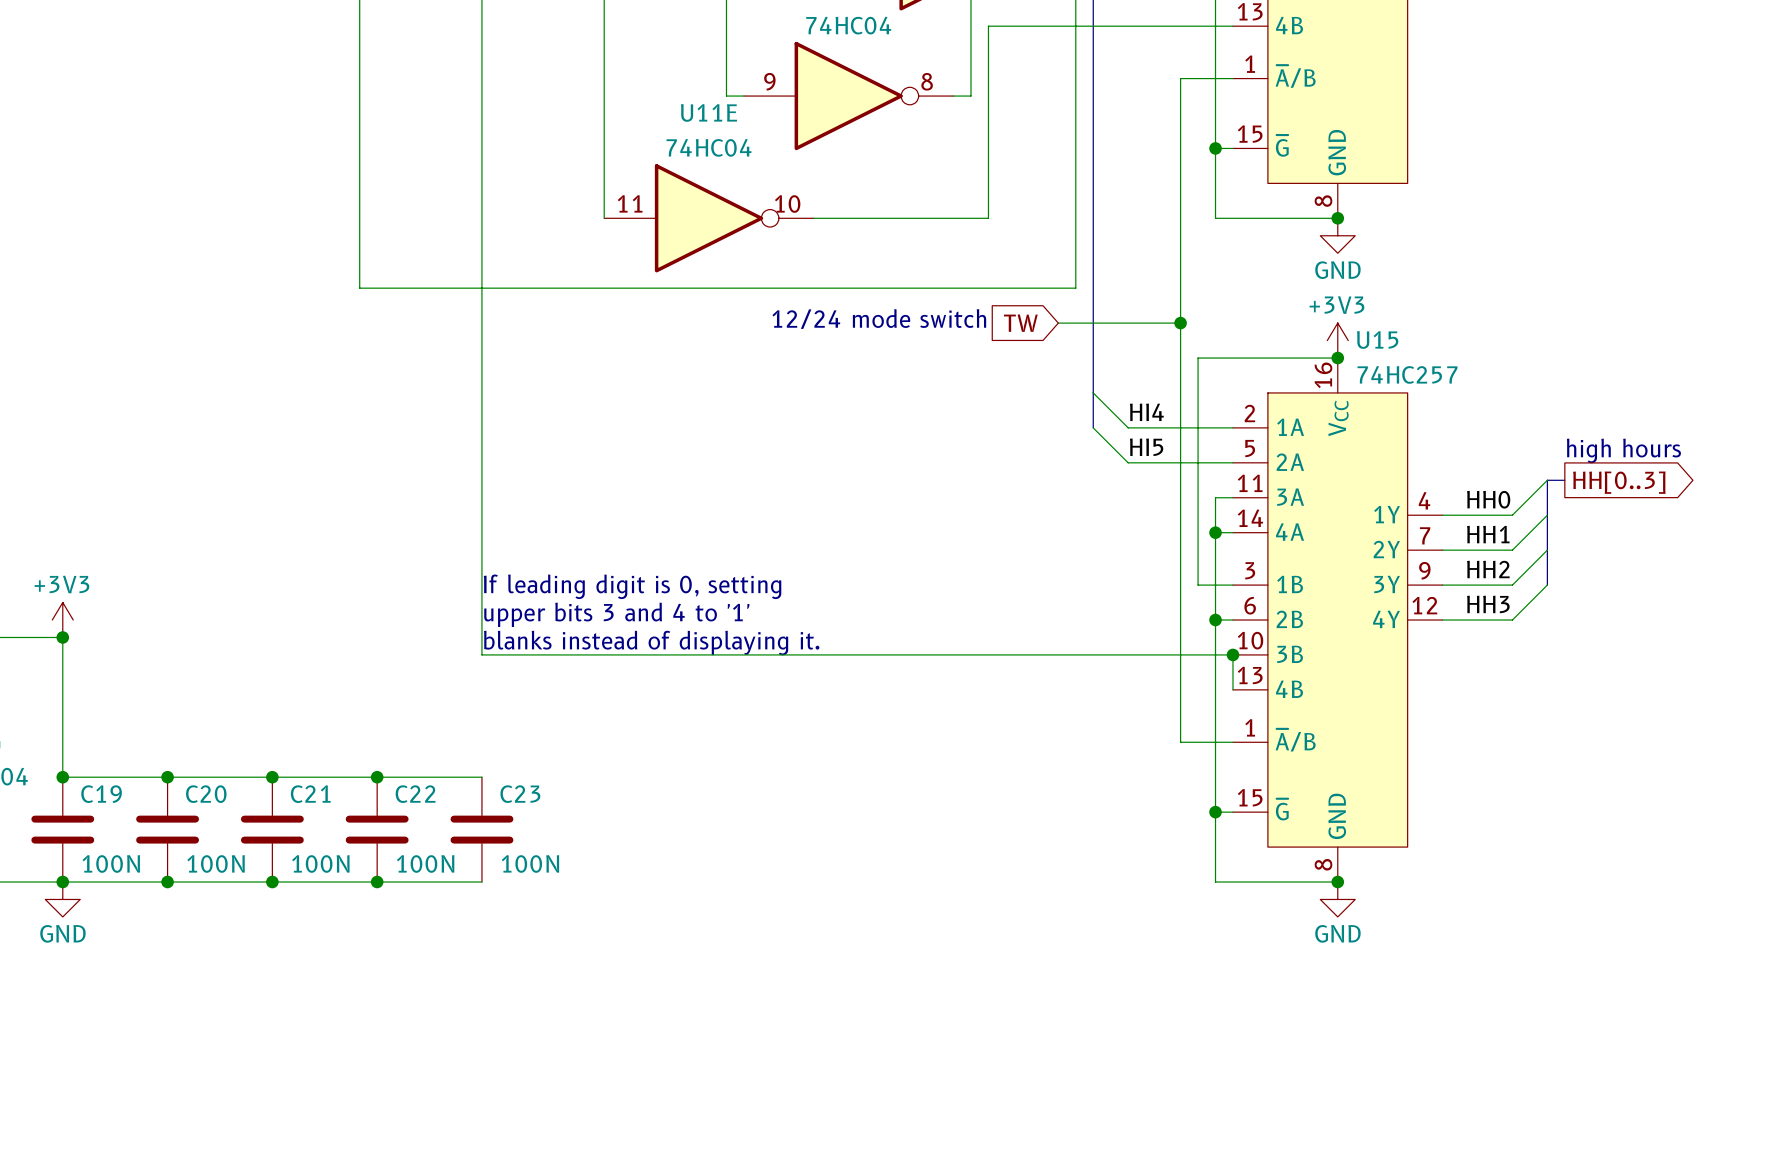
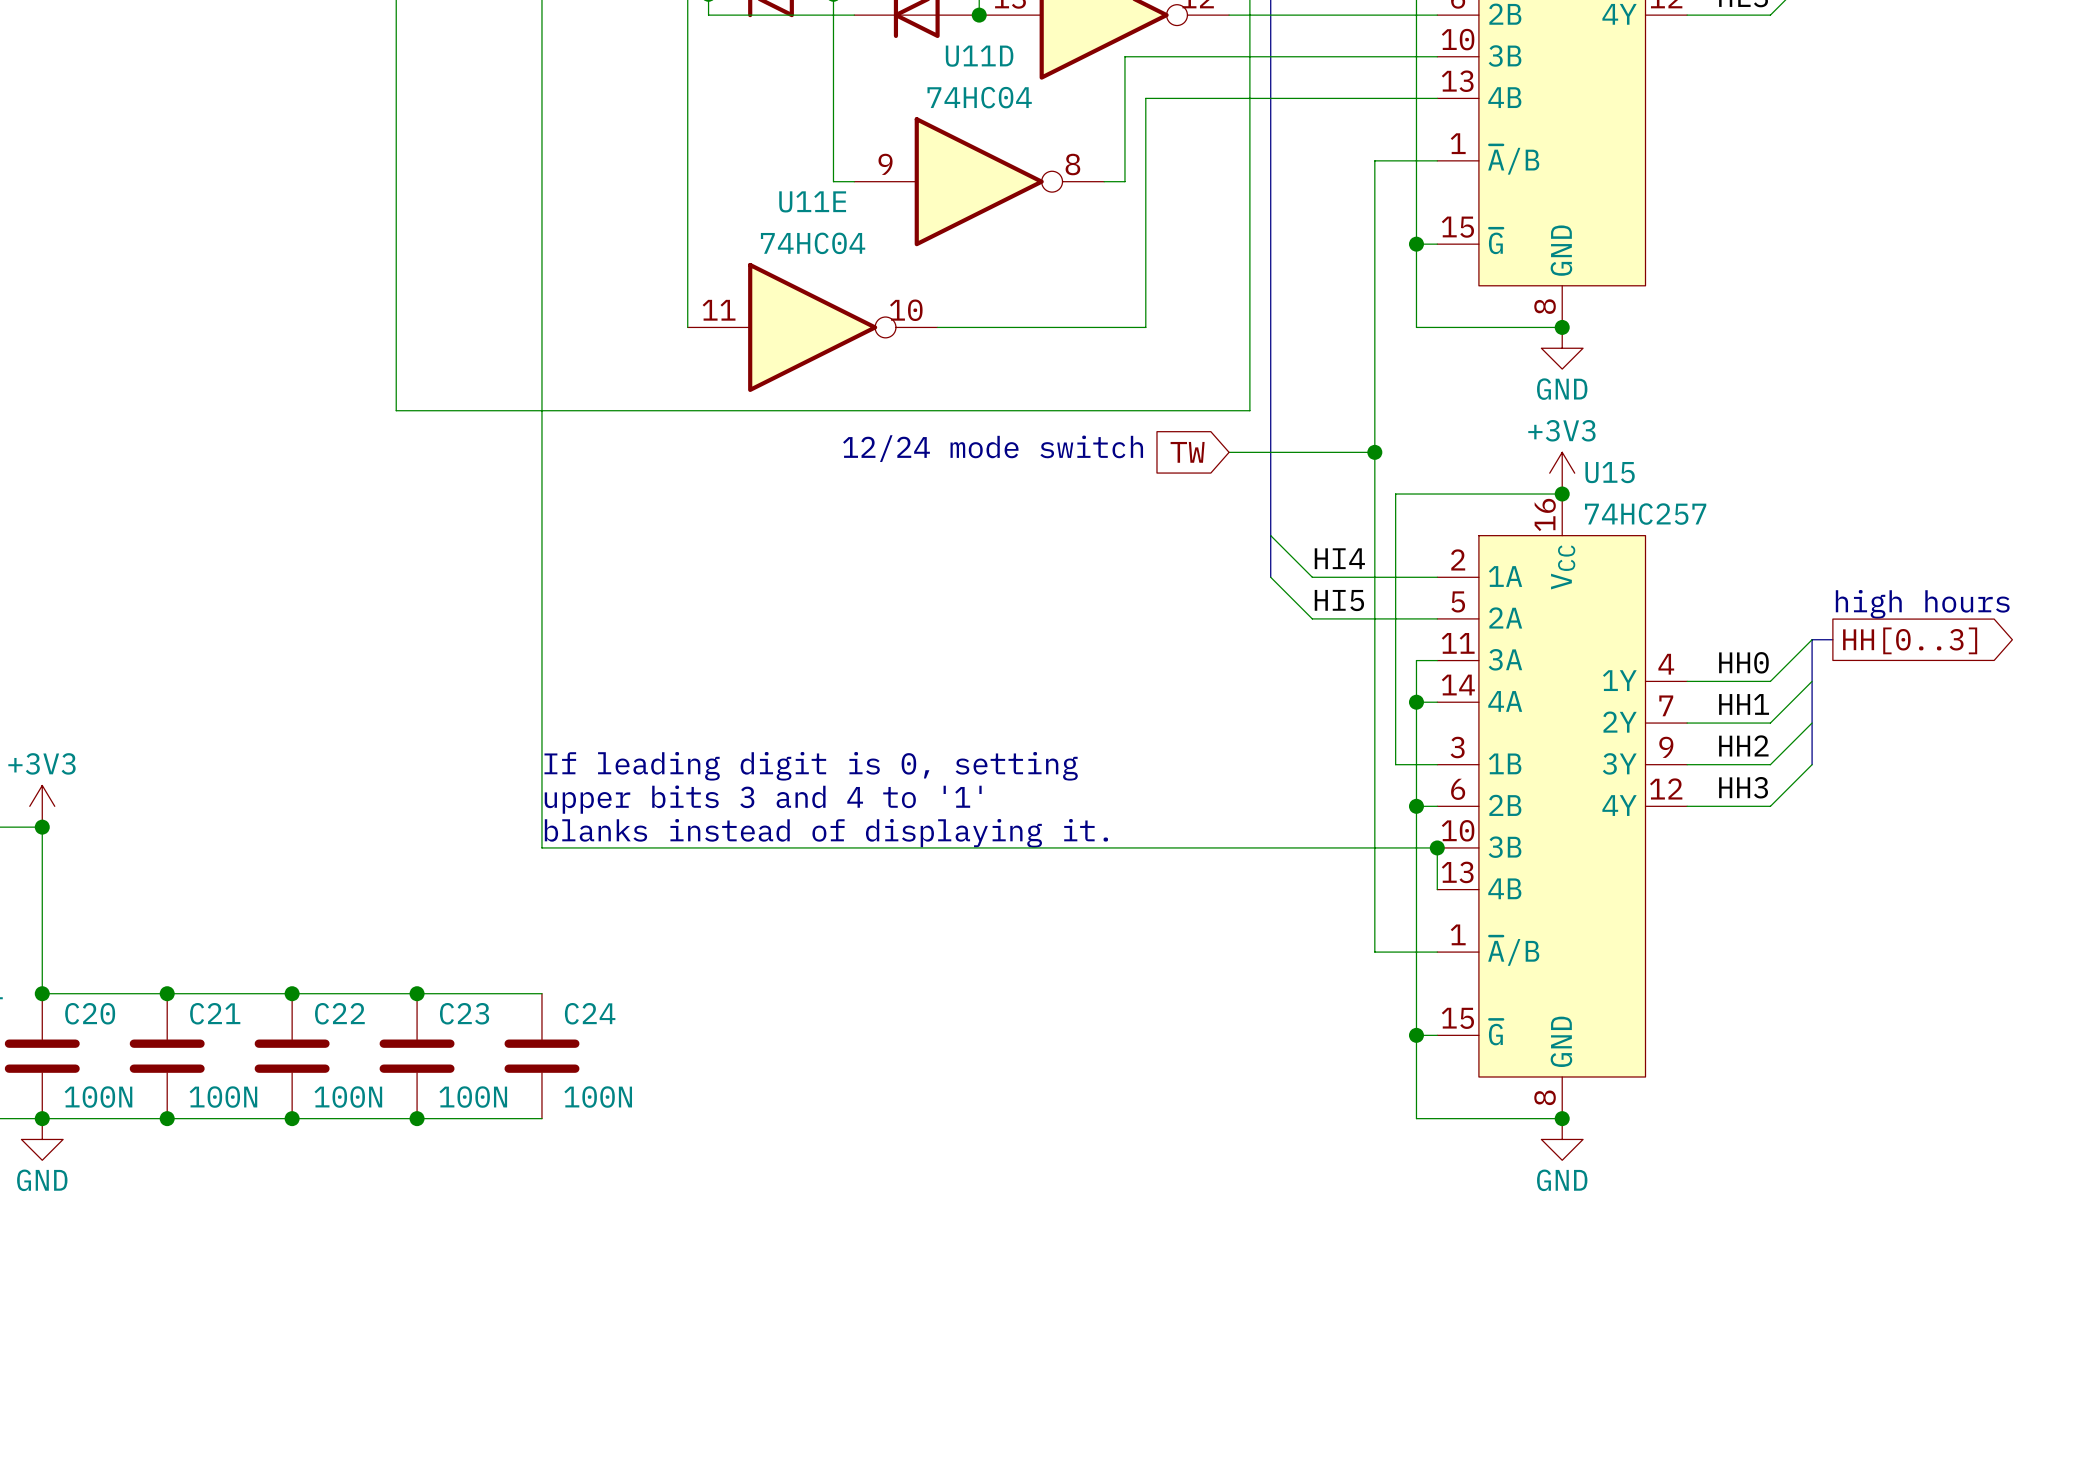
C19 name: C19 (101, 794) -> C20 (90, 1013)
C20 name: C20 (206, 794) -> C21 (215, 1013)
C21 name: C21 (310, 794) -> C22 (339, 1013)
C22 name: C22 (415, 794) -> C23 (464, 1013)
C23 name: C23 (520, 794) -> C24 (590, 1013)

